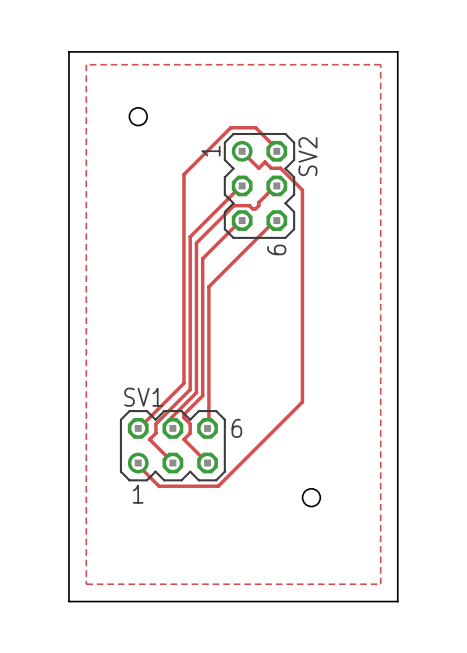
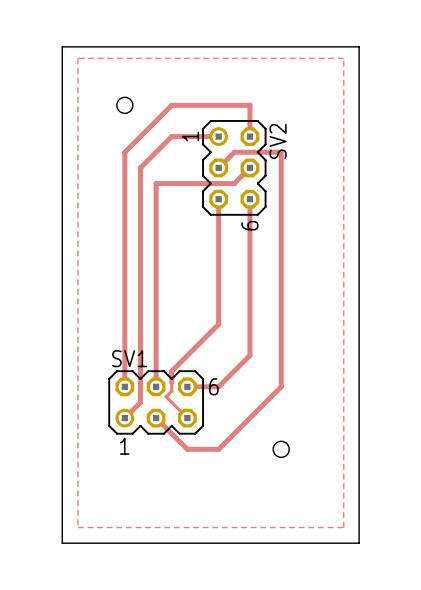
top track: (242, 151) (258, 168) (265, 162) (271, 168) (280, 168) (302, 190) (302, 402) (218, 486) (159, 486) (138, 463) -> (218, 136) (171, 136) (140, 167) (140, 402) (124, 418)
top track: (276, 151) (277, 149) (255, 127) (230, 127) (183, 174) (183, 383) (138, 428) -> (249, 136) (249, 105) (171, 105) (124, 152) (124, 386)
top track: (242, 185) (190, 236) (190, 389) (155, 423) (155, 433) (149, 439) (172, 463) -> (218, 167) (234, 152) (281, 152) (281, 386) (218, 449) (187, 449) (156, 418)
top track: (276, 185) (258, 202) (255, 208) (249, 205) (233, 205) (196, 243) (196, 392) (171, 417) (172, 428) -> (249, 167) (234, 183) (156, 183) (156, 386)
top track: (242, 220) (202, 258) (202, 395) (183, 414) (183, 417) (190, 423) -> (218, 199) (218, 324) (171, 371) (171, 382)
top track: (276, 220) (208, 286) (207, 428) -> (249, 199) (249, 355) (218, 386) (187, 386)

